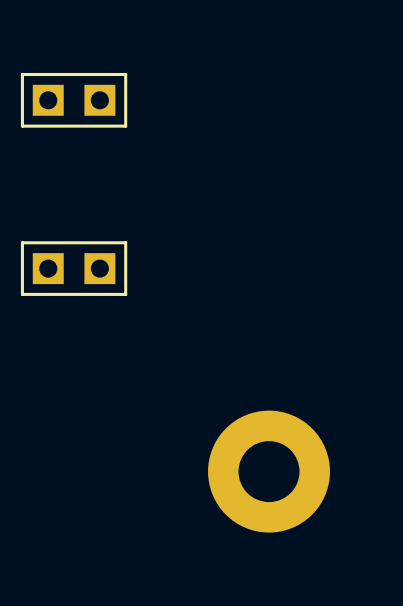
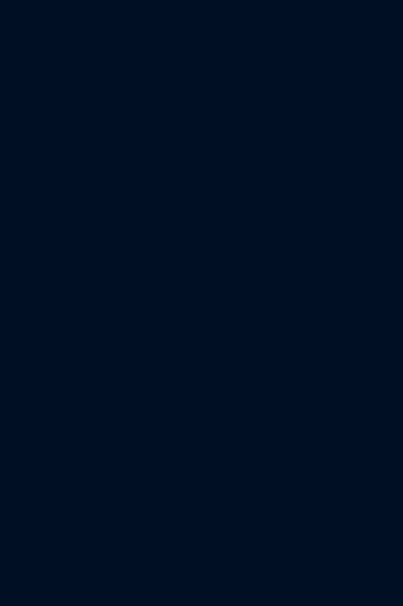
part: (74, 100) -> none
part: (74, 268) -> none
part: (269, 471) -> none

